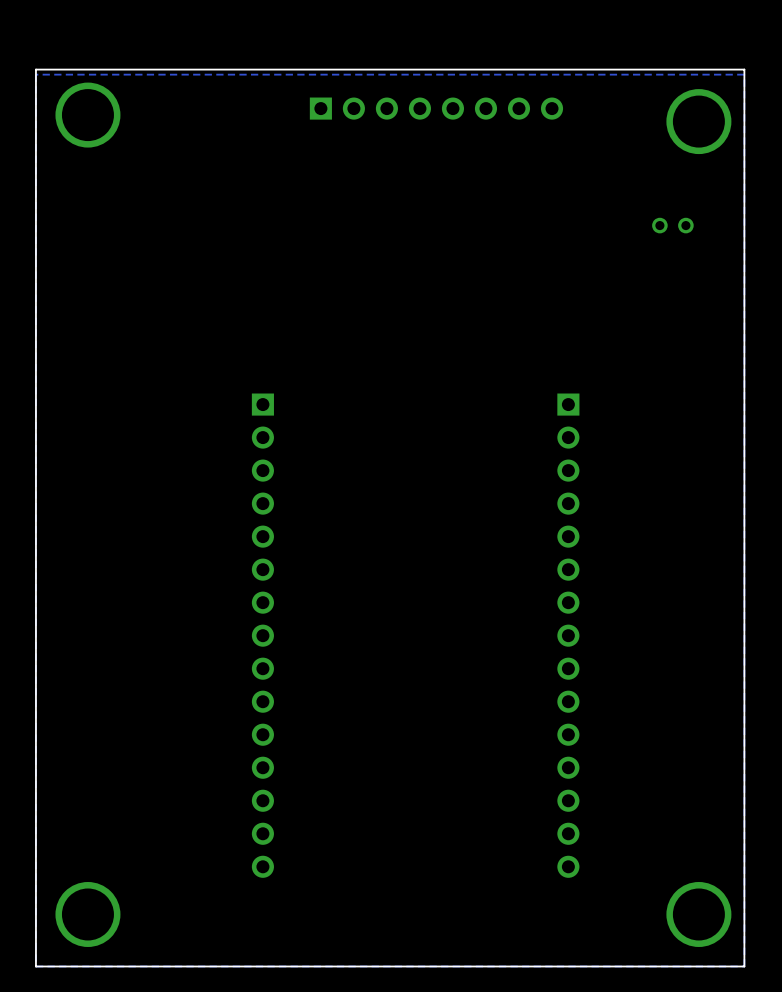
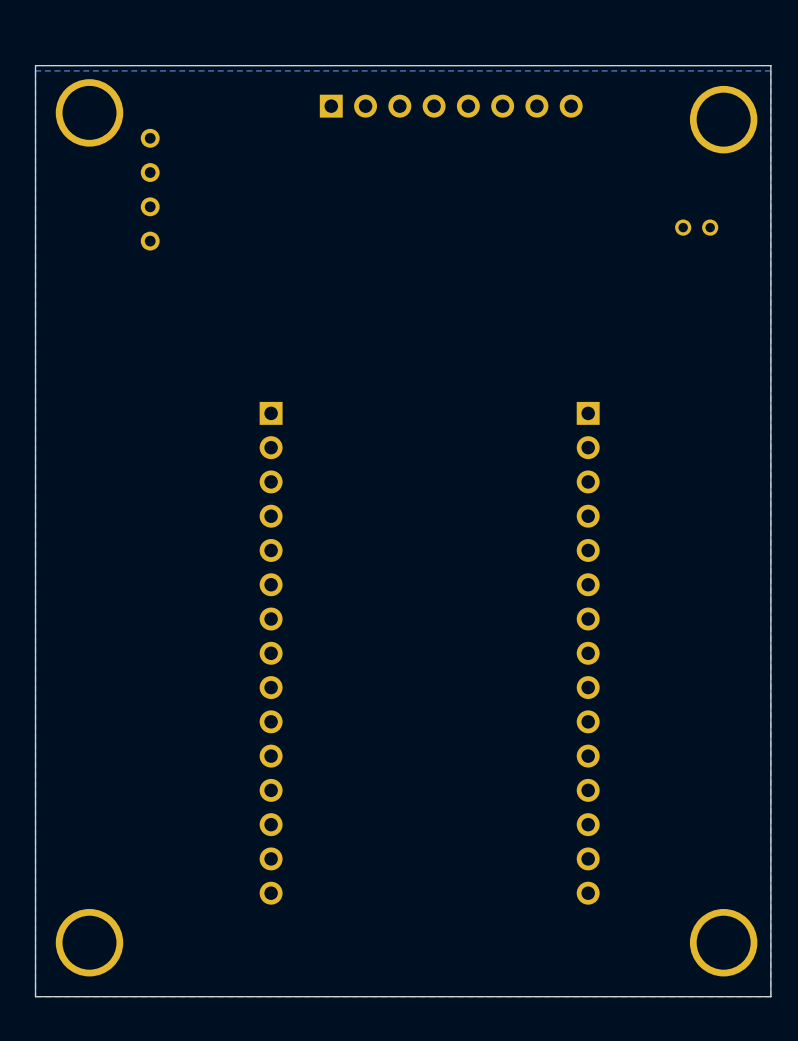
part: none -> (150, 189)

